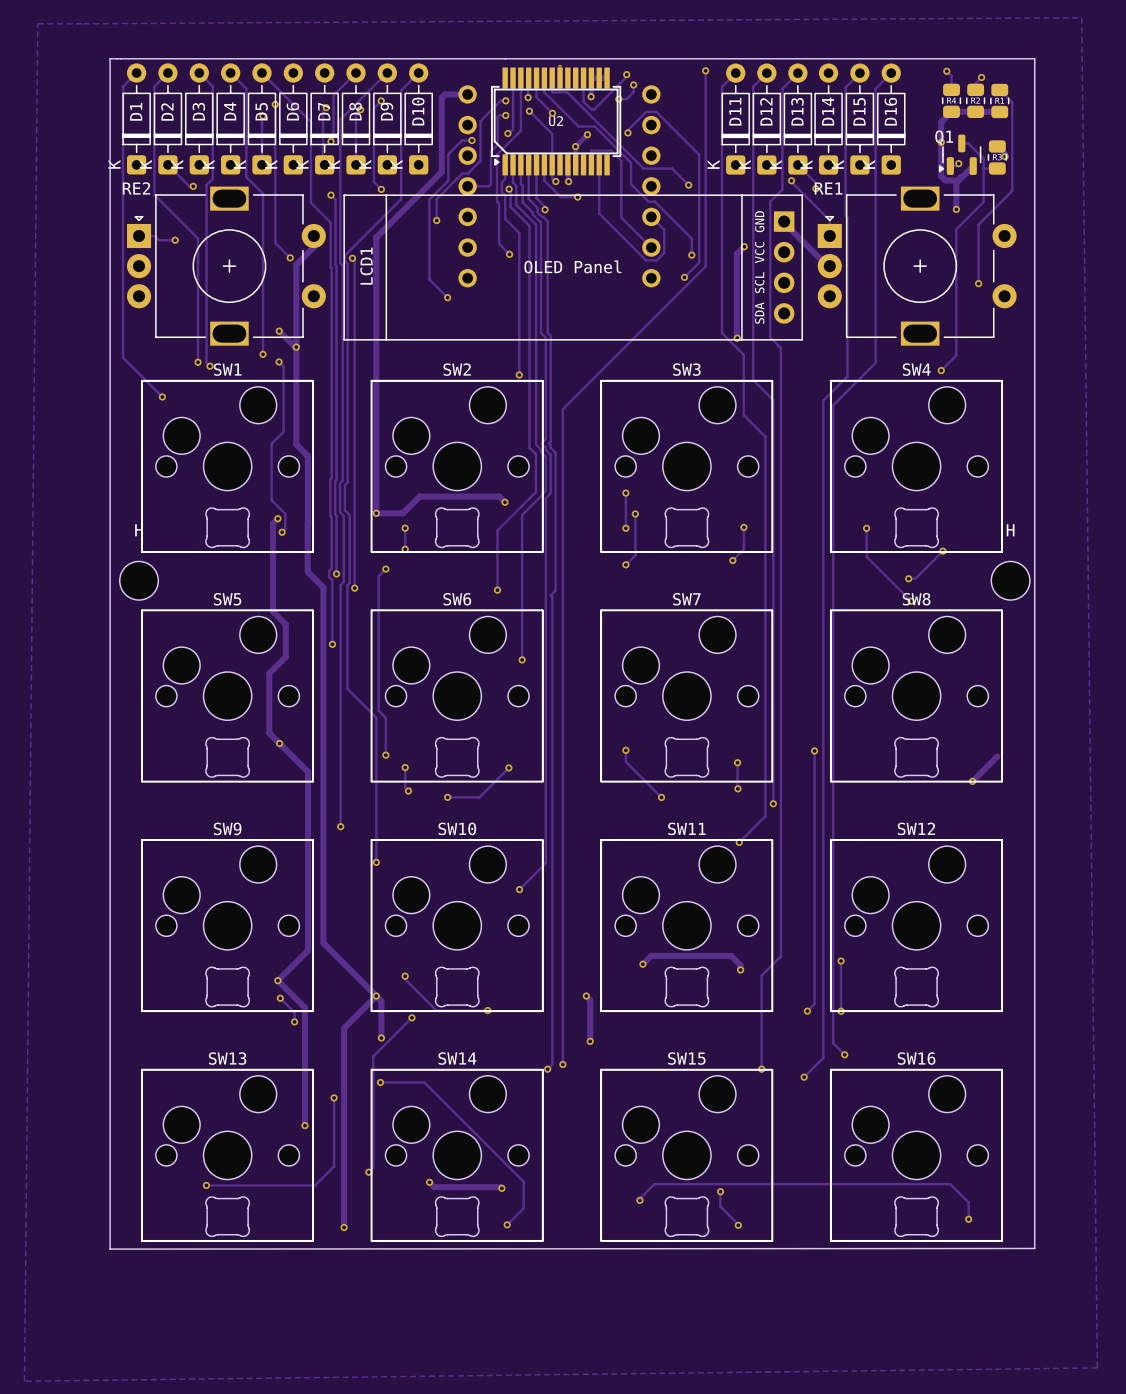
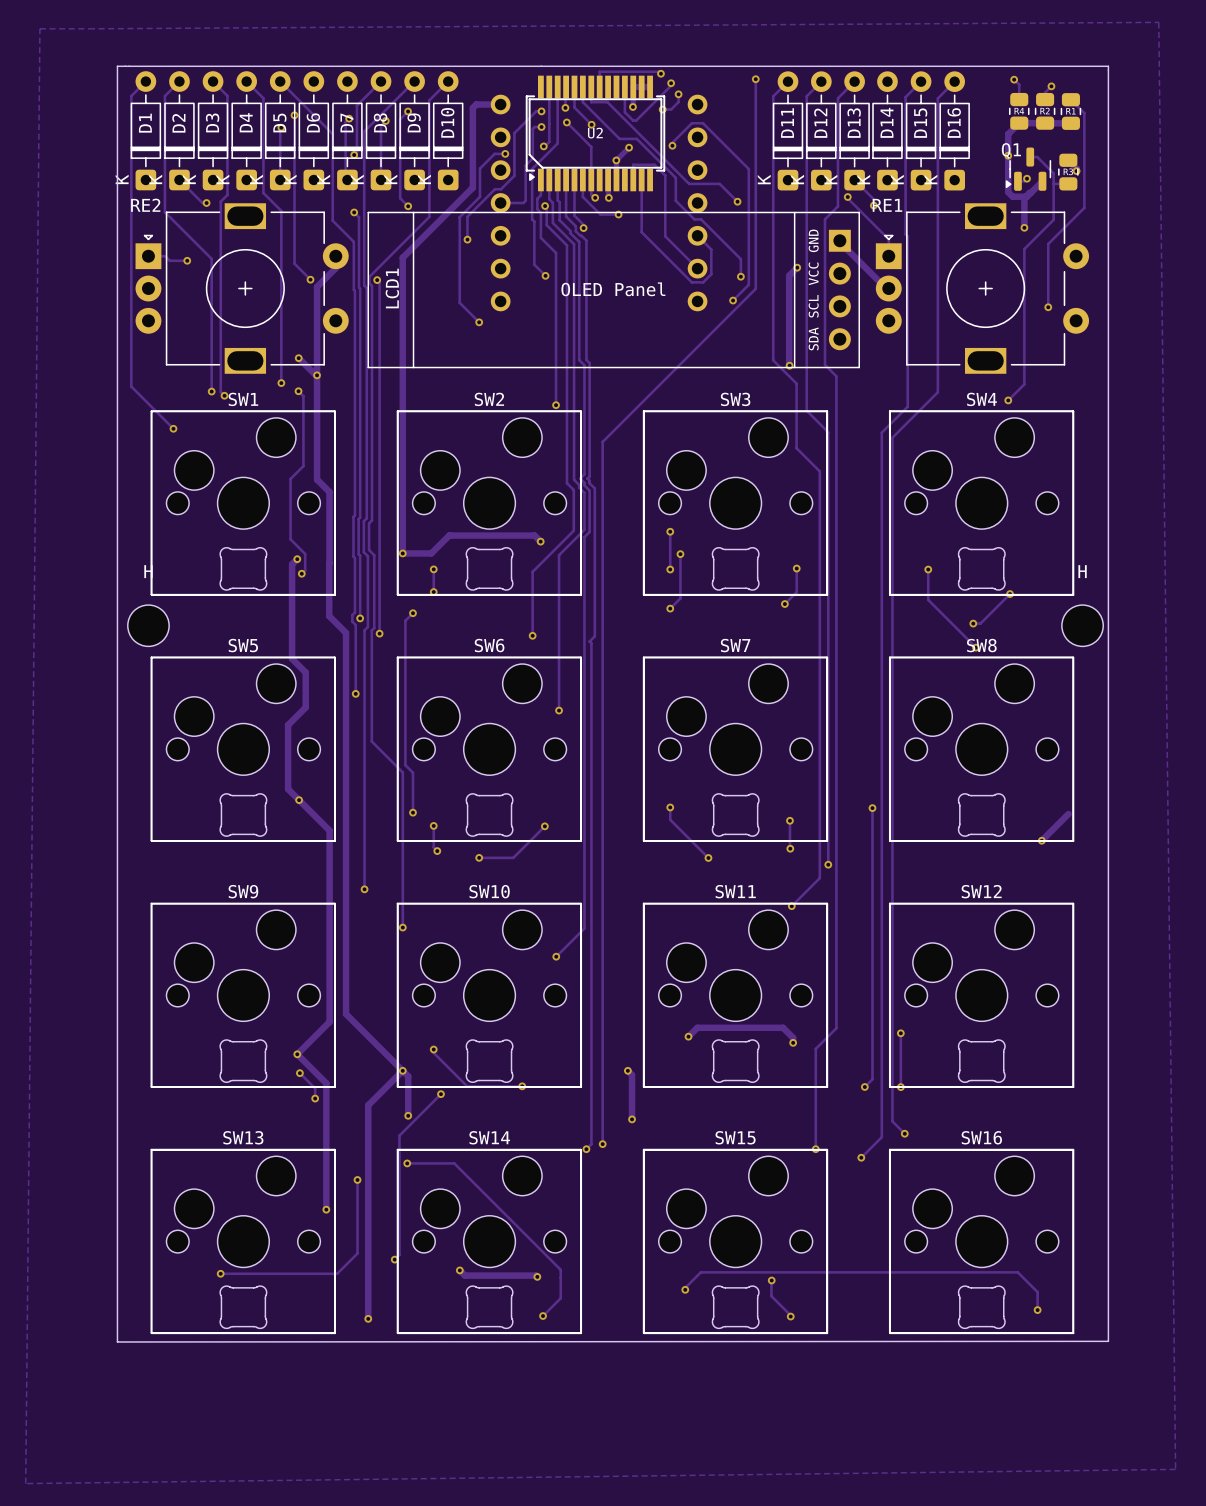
track: none -> (660, 73) (658, 71) (599, 71) (599, 74)
via: none -> (660, 73)
via: (560, 66) -> none

